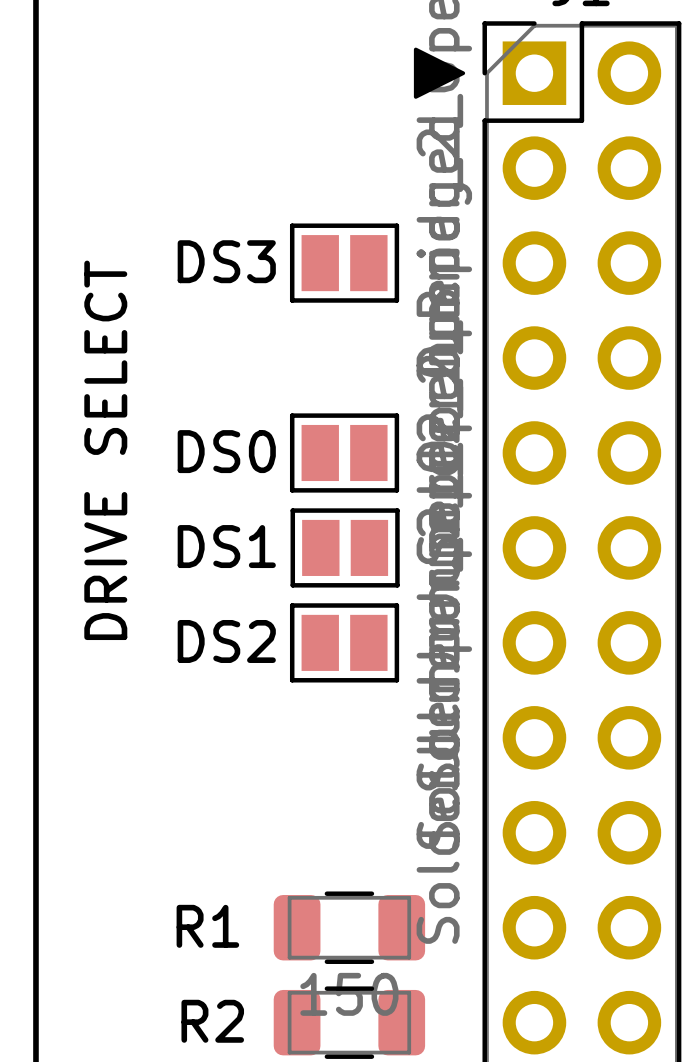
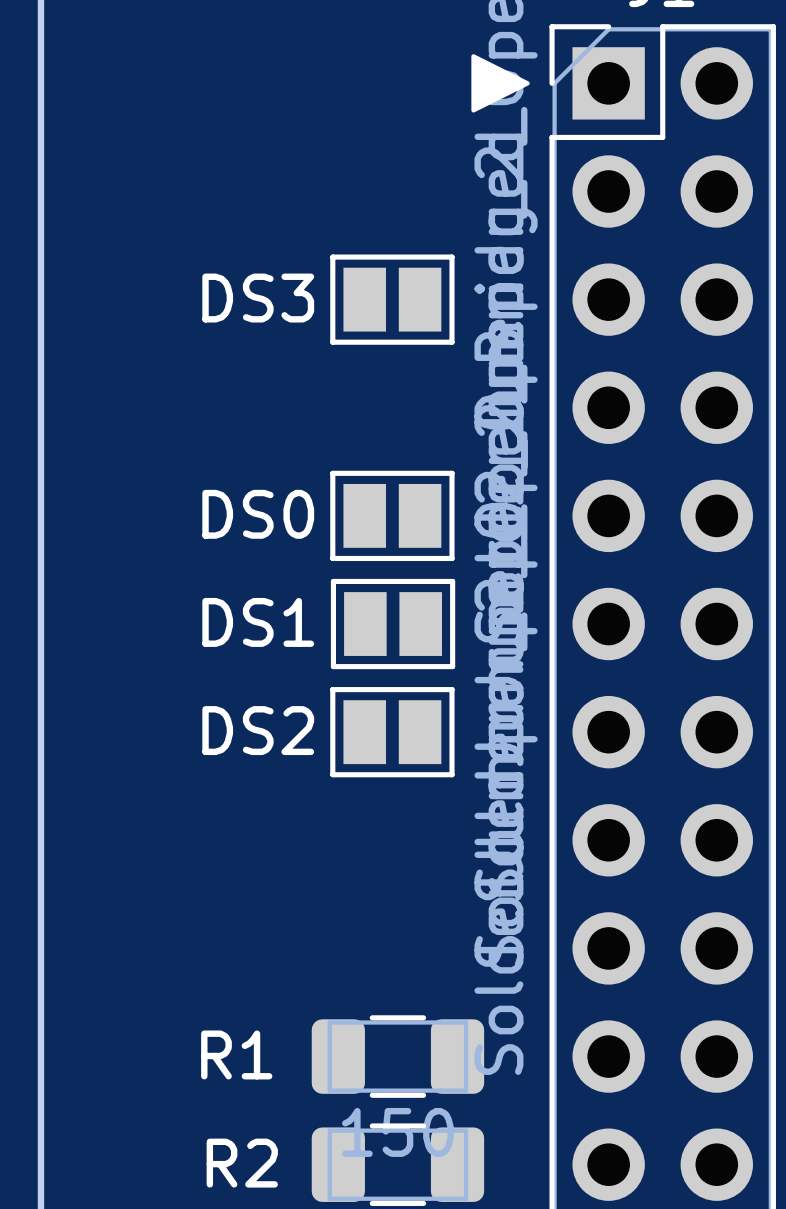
text: DRIVE SELECT (105, 450) -> none

